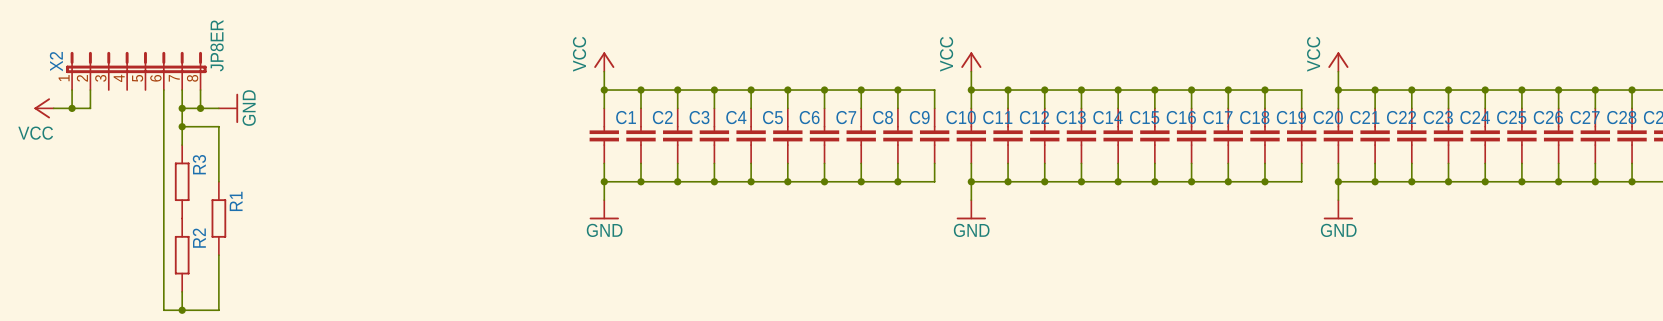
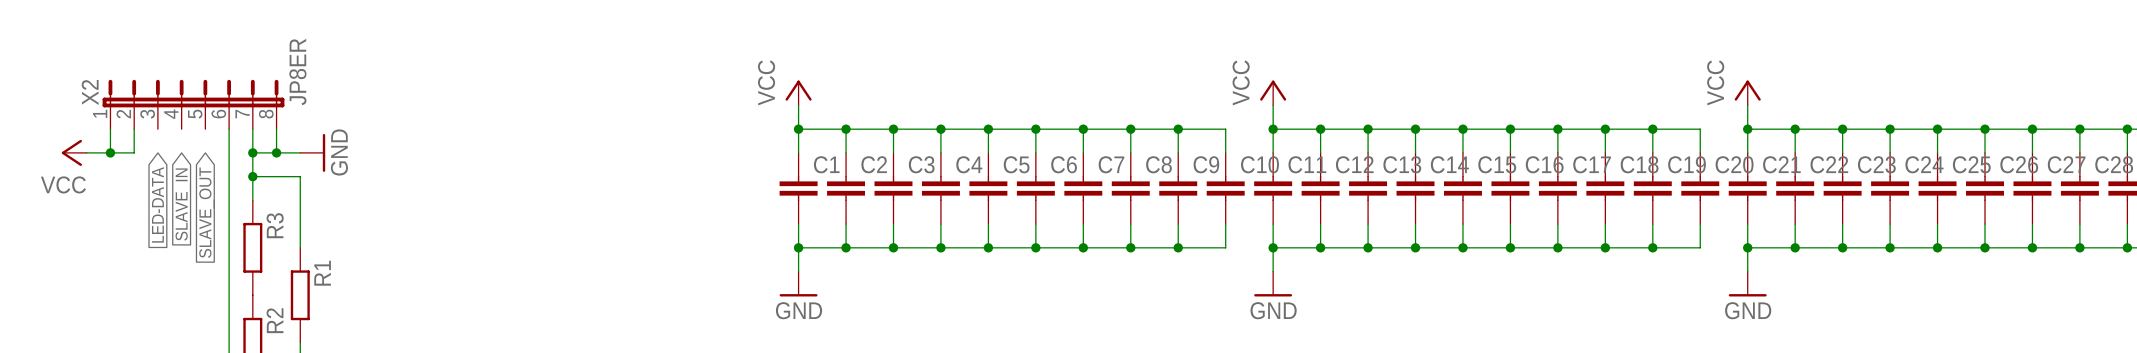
global label: none -> LED-DATA (157, 204)
global label: none -> SLAVE_IN (183, 204)
global label: none -> SLAVE_OUT (206, 212)

